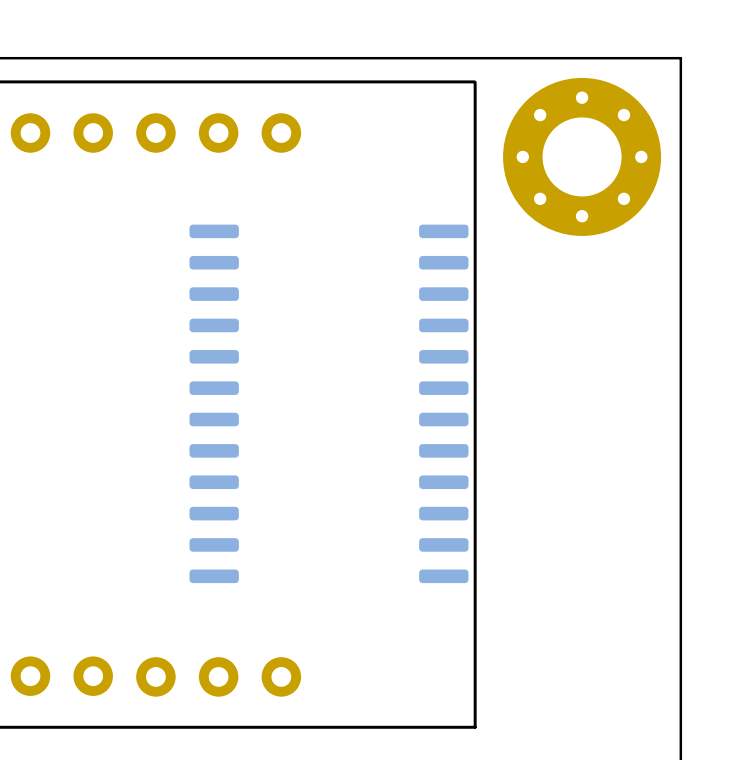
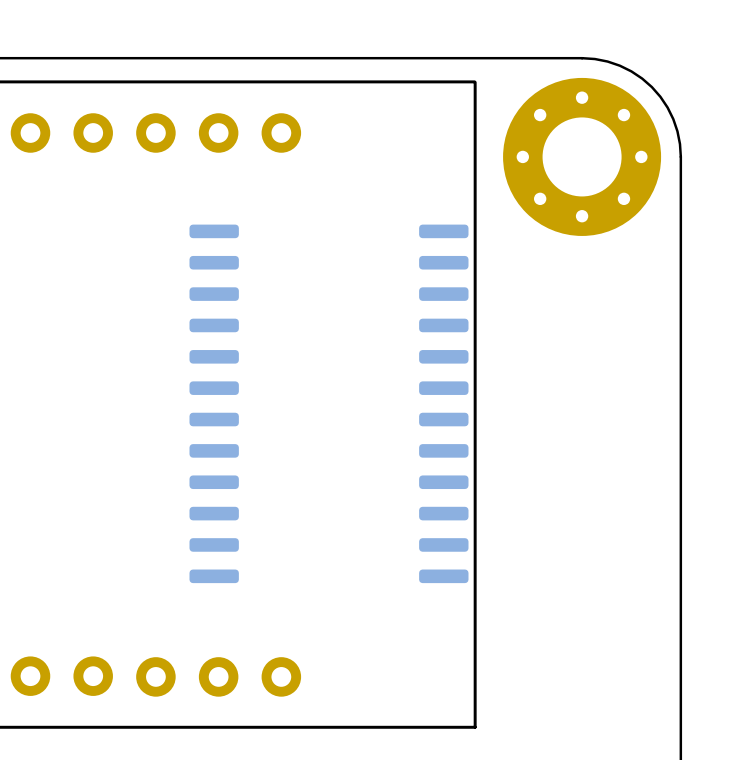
board edge: (582, 58) (680, 58) (680, 156) -> (582, 58) (607, 61) (619, 65) (631, 71) (651, 87) (660, 96) (673, 119) (679, 144) (680, 156)

